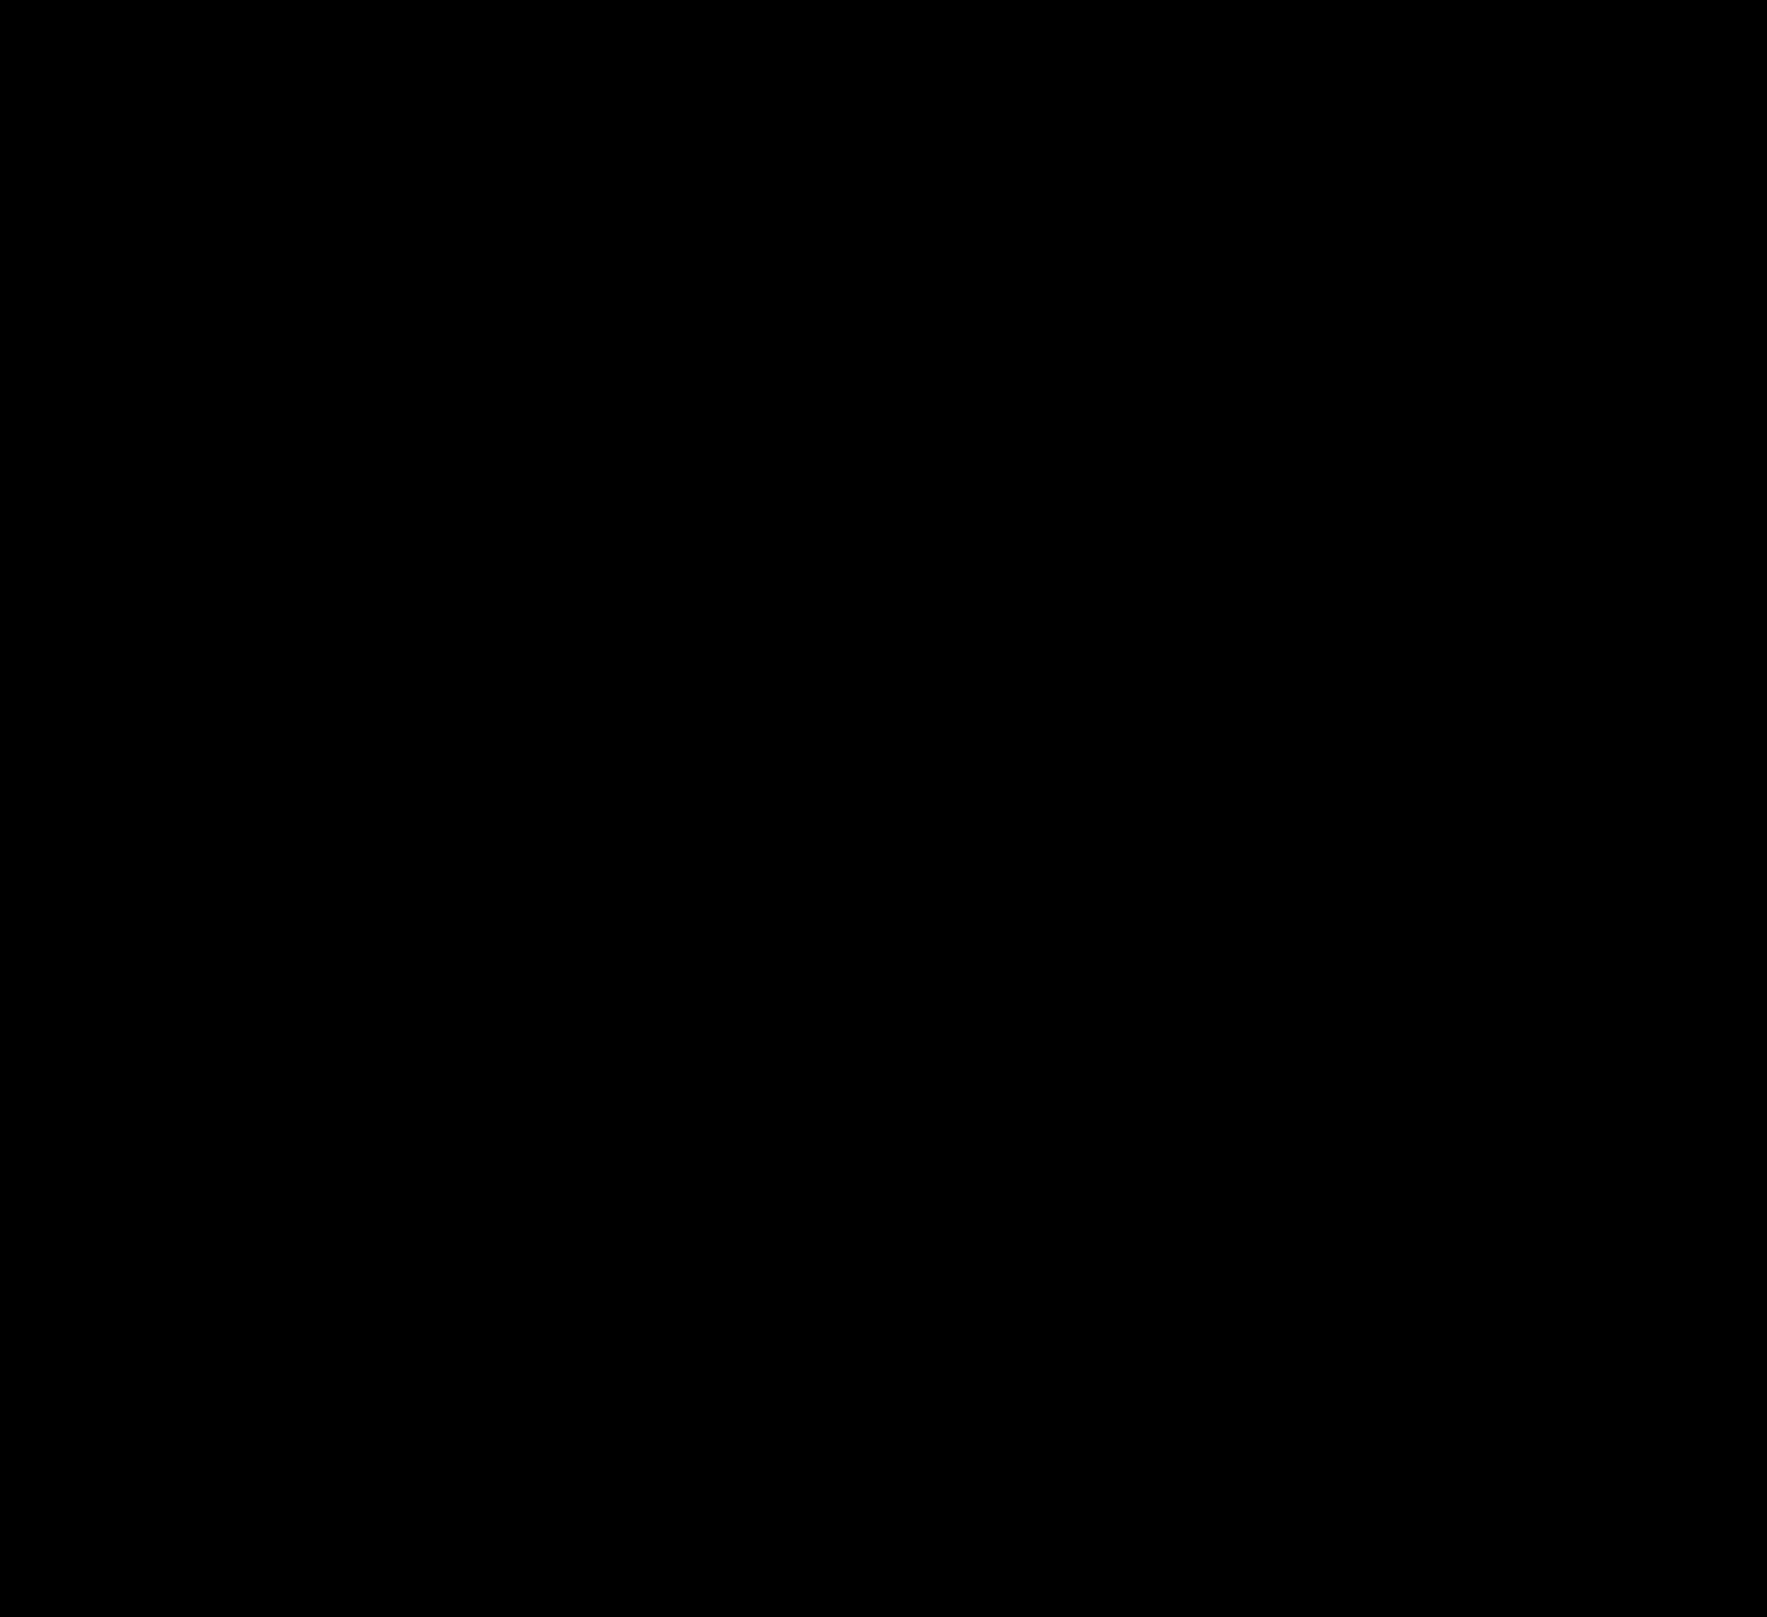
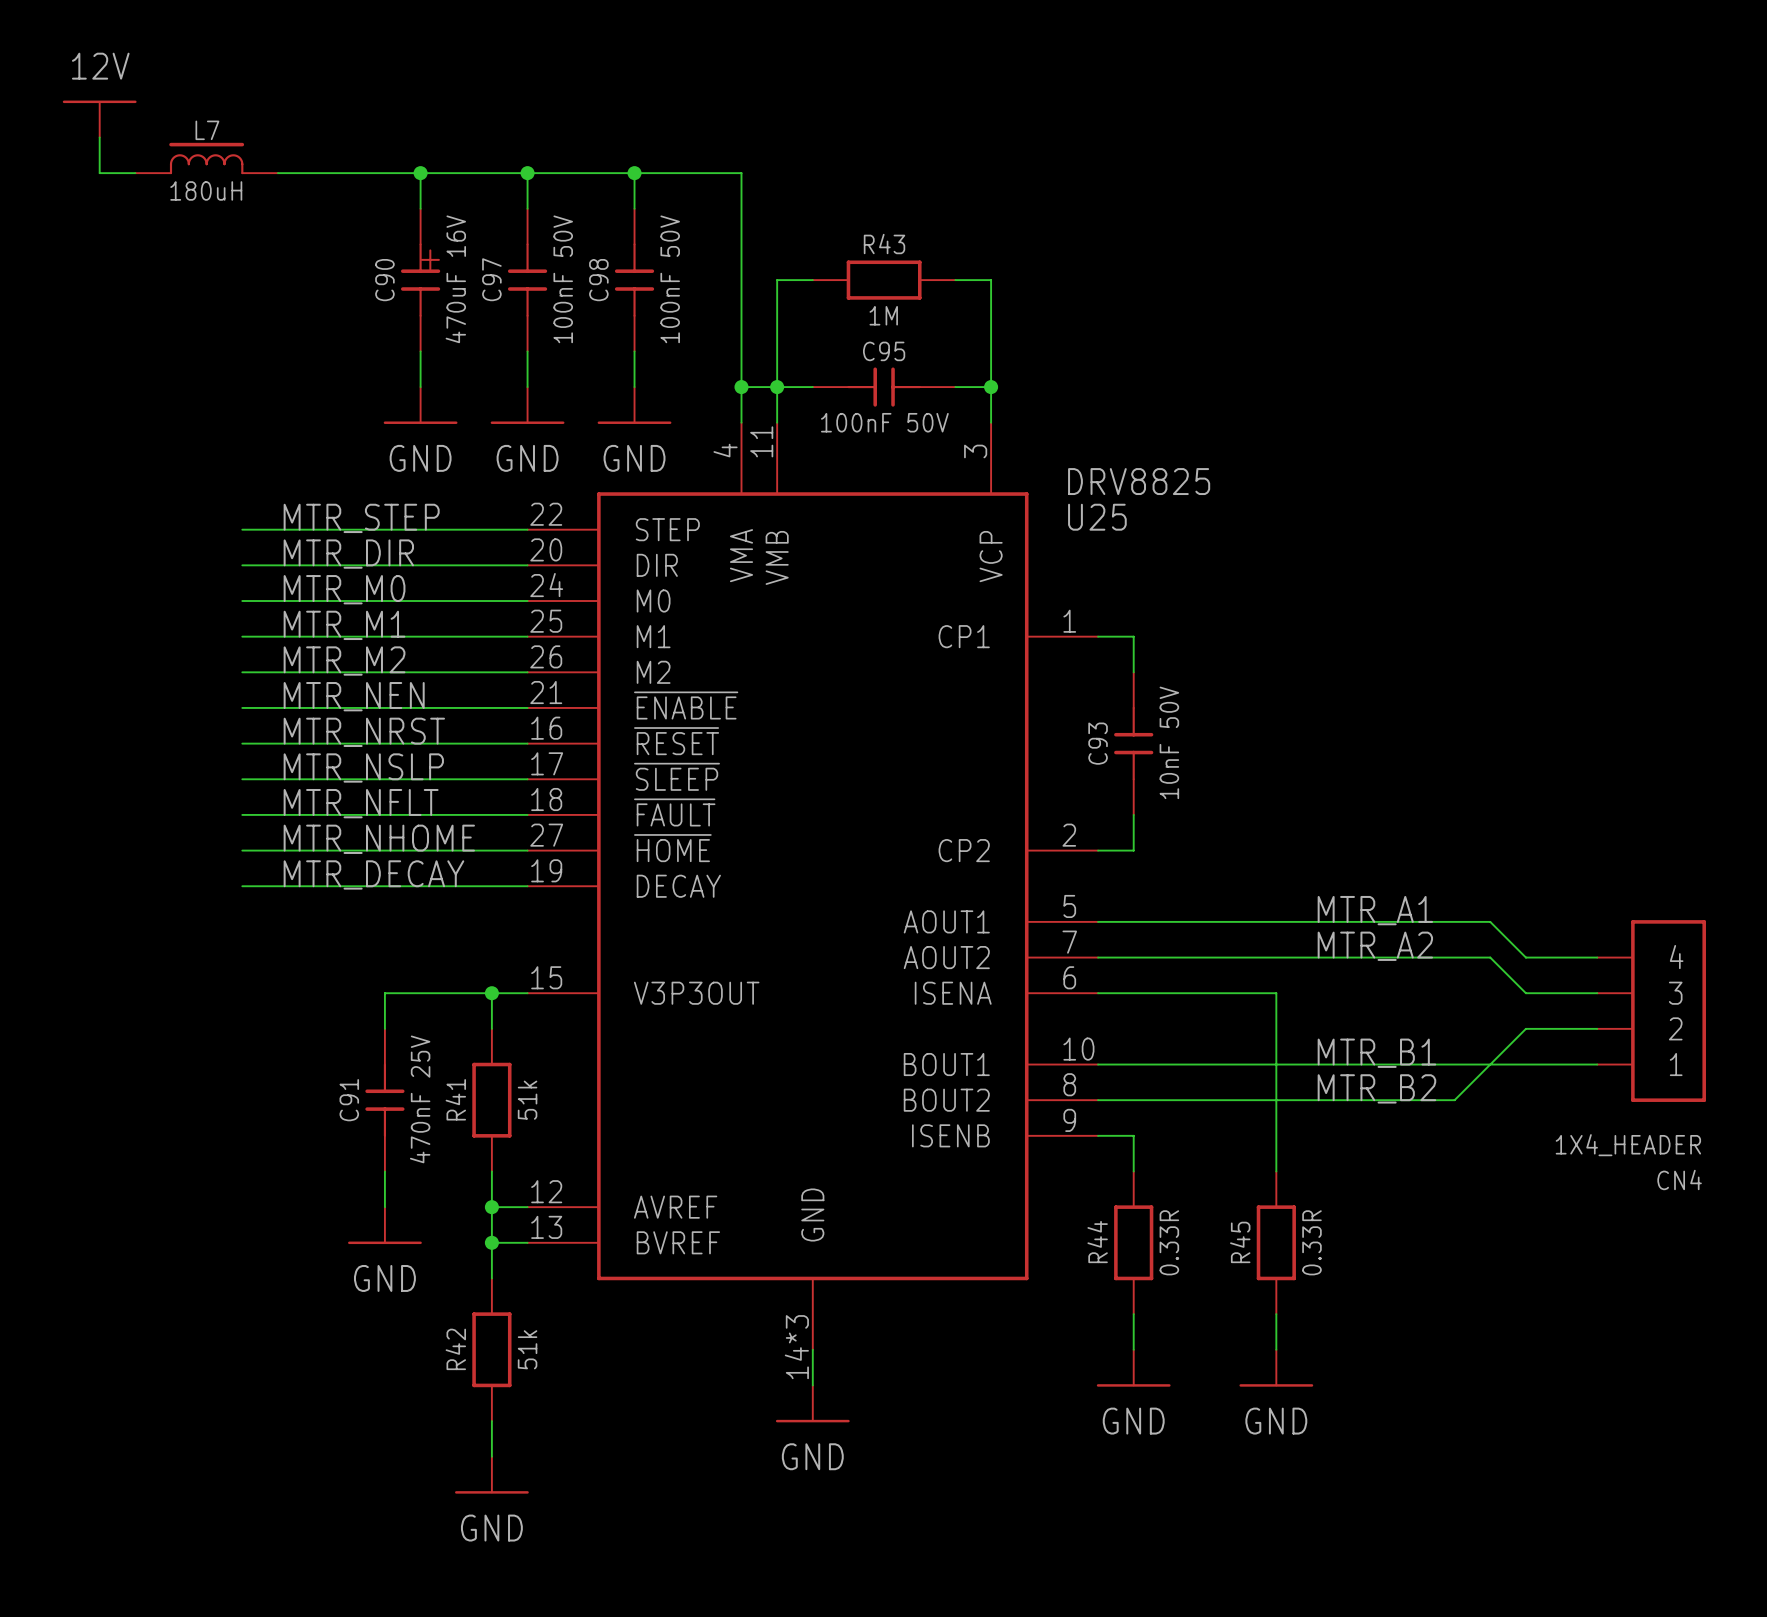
power symbol: none -> 12V (99, 119)
wire: none -> (99, 137) (99, 173) (135, 173)
L7: none -> 180uH (206, 158)
wire: none -> (277, 173) (741, 173) (741, 422)
wire: none -> (420, 173) (420, 208)
junction: none -> (420, 173)
wire: none -> (527, 173) (527, 208)
junction: none -> (527, 173)
wire: none -> (634, 173) (634, 208)
junction: none -> (634, 173)
C90: none -> 470uF 16V (420, 280)
C97: none -> 100nF 50V (527, 280)
C98: none -> 100nF 50V (634, 280)
wire: none -> (812, 280) (777, 280) (777, 422)
R43: none -> 1M (884, 280)
wire: none -> (955, 280) (991, 280) (991, 422)
wire: none -> (420, 351) (420, 387)
wire: none -> (527, 351) (527, 387)
wire: none -> (634, 351) (634, 387)
wire: none -> (741, 387) (812, 387)
junction: none -> (741, 387)
junction: none -> (777, 387)
C95: none -> 100nF 50V (884, 387)
wire: none -> (955, 387) (991, 387)
junction: none -> (991, 387)
power symbol: none -> GND (420, 405)
power symbol: none -> GND (527, 405)
power symbol: none -> GND (634, 405)
label: none -> MTR_STEP (361, 518)
wire: none -> (242, 529) (527, 529)
label: none -> MTR_DIR (348, 554)
wire: none -> (242, 565) (527, 565)
label: none -> MTR_M0 (344, 589)
wire: none -> (242, 601) (527, 601)
label: none -> MTR_M1 (344, 625)
wire: none -> (242, 636) (527, 636)
wire: none -> (1098, 636) (1133, 636) (1133, 672)
label: none -> MTR_M2 (344, 661)
wire: none -> (242, 672) (527, 672)
label: none -> MTR_NEN (354, 696)
wire: none -> (242, 707) (527, 707)
label: none -> MTR_NRST (364, 732)
wire: none -> (242, 743) (527, 743)
C93: none -> 10nF 50V (1133, 743)
label: none -> MTR_NSLP (363, 767)
wire: none -> (242, 779) (527, 779)
label: none -> MTR_NFLT (361, 803)
wire: none -> (242, 814) (527, 814)
wire: none -> (1133, 814) (1133, 850) (1098, 850)
label: none -> MTR_NHOME (379, 839)
wire: none -> (242, 850) (527, 850)
label: none -> MTR_DECAY (373, 874)
wire: none -> (242, 886) (527, 886)
U25: none -> DRV8825 (812, 886)
label: none -> MTR_A1 (1375, 910)
wire: none -> (1098, 921) (1490, 921) (1525, 957) (1597, 957)
label: none -> MTR_A2 (1375, 946)
wire: none -> (1098, 957) (1490, 957) (1525, 993) (1597, 993)
wire: none -> (491, 993) (491, 1028)
junction: none -> (491, 993)
wire: none -> (527, 993) (384, 993) (384, 1028)
wire: none -> (1098, 993) (1276, 993) (1276, 1171)
CN4: none -> 1X4_HEADER (1651, 1011)
wire: none -> (1597, 1028) (1525, 1028) (1454, 1100) (1098, 1100)
label: none -> MTR_B1 (1376, 1053)
wire: none -> (1098, 1064) (1597, 1064)
label: none -> MTR_B2 (1376, 1088)
C91: none -> 470nF 25V (384, 1100)
R41: none -> 51k (491, 1100)
wire: none -> (1098, 1135) (1133, 1135) (1133, 1171)
wire: none -> (384, 1171) (384, 1207)
wire: none -> (491, 1171) (491, 1278)
wire: none -> (491, 1207) (527, 1207)
junction: none -> (491, 1207)
power symbol: none -> GND (384, 1225)
wire: none -> (491, 1242) (527, 1242)
junction: none -> (491, 1242)
R44: none -> 0.33R (1133, 1242)
R45: none -> 0.33R (1276, 1242)
wire: none -> (1133, 1314) (1133, 1349)
wire: none -> (1276, 1314) (1276, 1349)
R42: none -> 51k (491, 1349)
wire: none -> (812, 1349) (812, 1385)
power symbol: none -> GND (1133, 1368)
power symbol: none -> GND (1276, 1368)
power symbol: none -> GND (812, 1403)
wire: none -> (491, 1421) (491, 1456)
power symbol: none -> GND (491, 1475)

